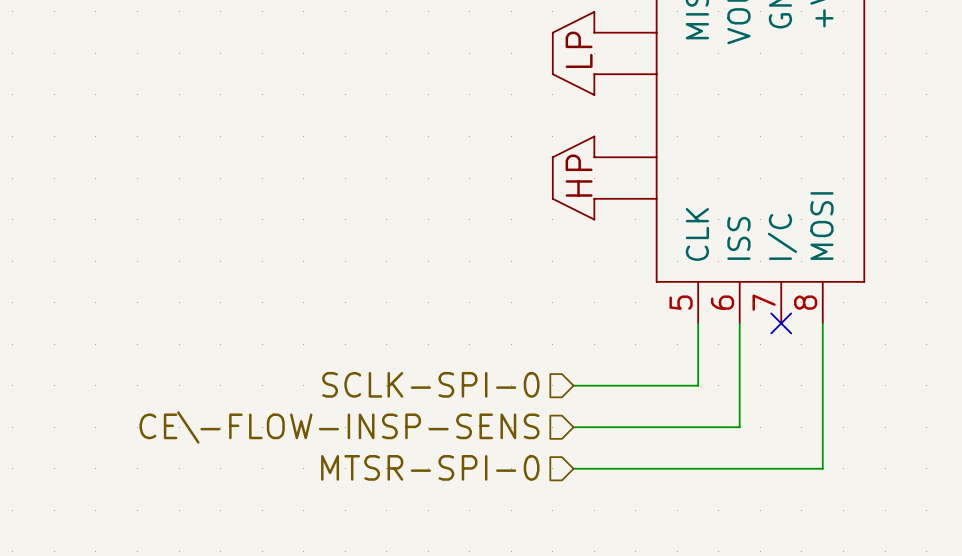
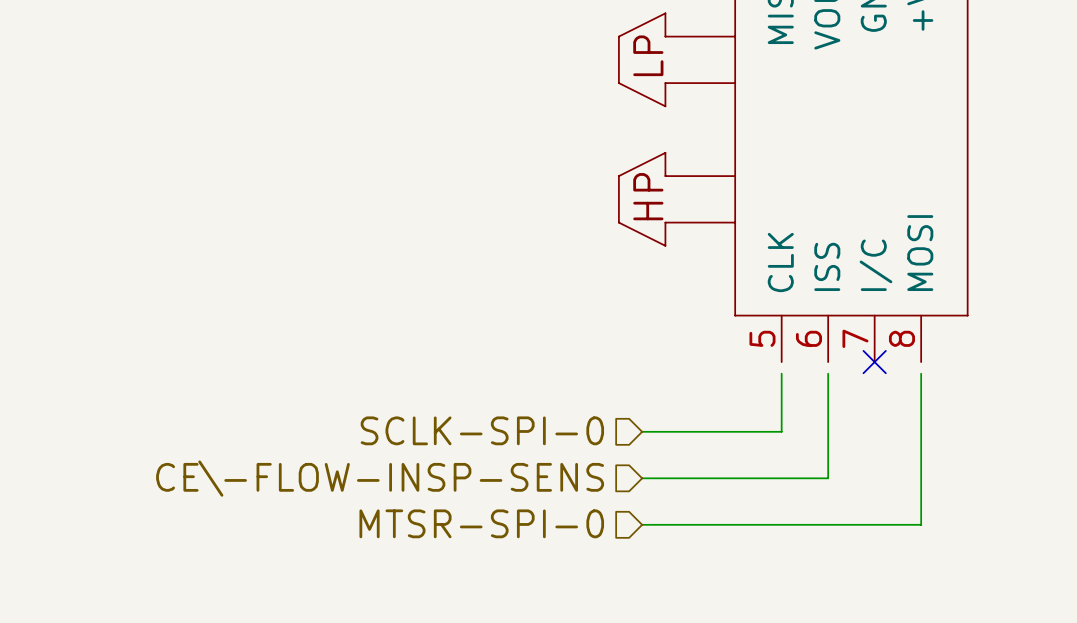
wire: (698, 323) (698, 333) -> none
wire: (739, 323) (739, 333) -> none
wire: (822, 323) (822, 333) -> none

